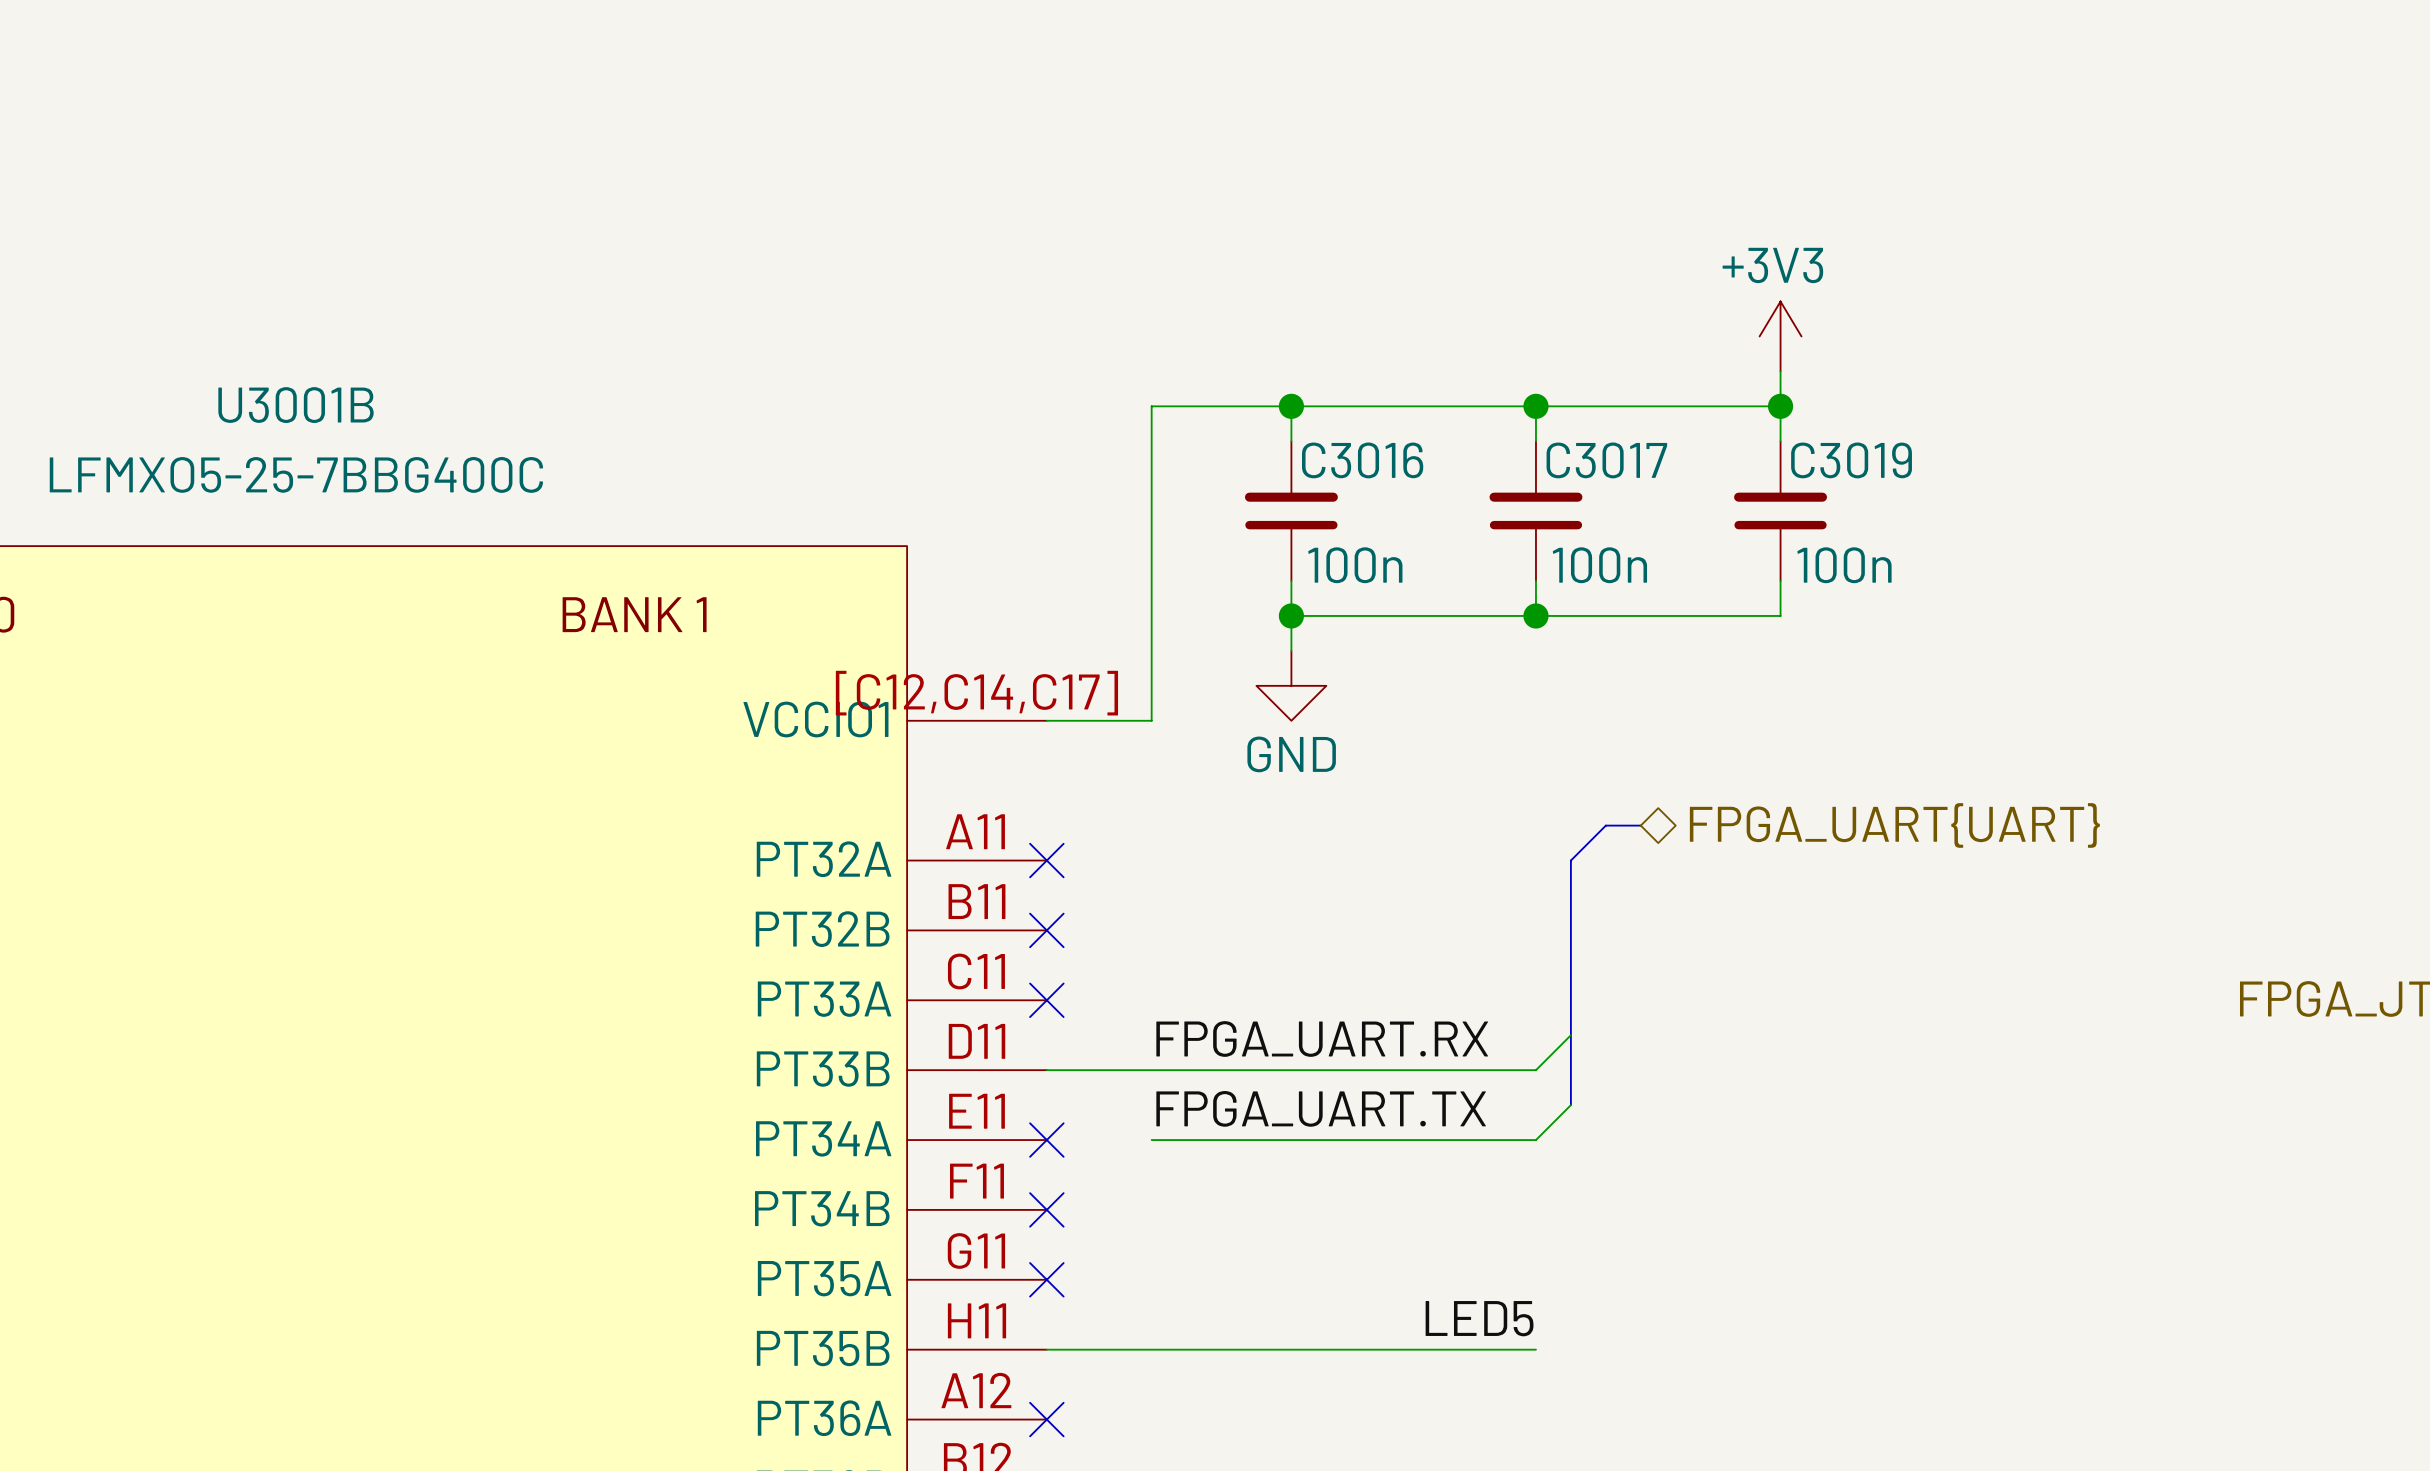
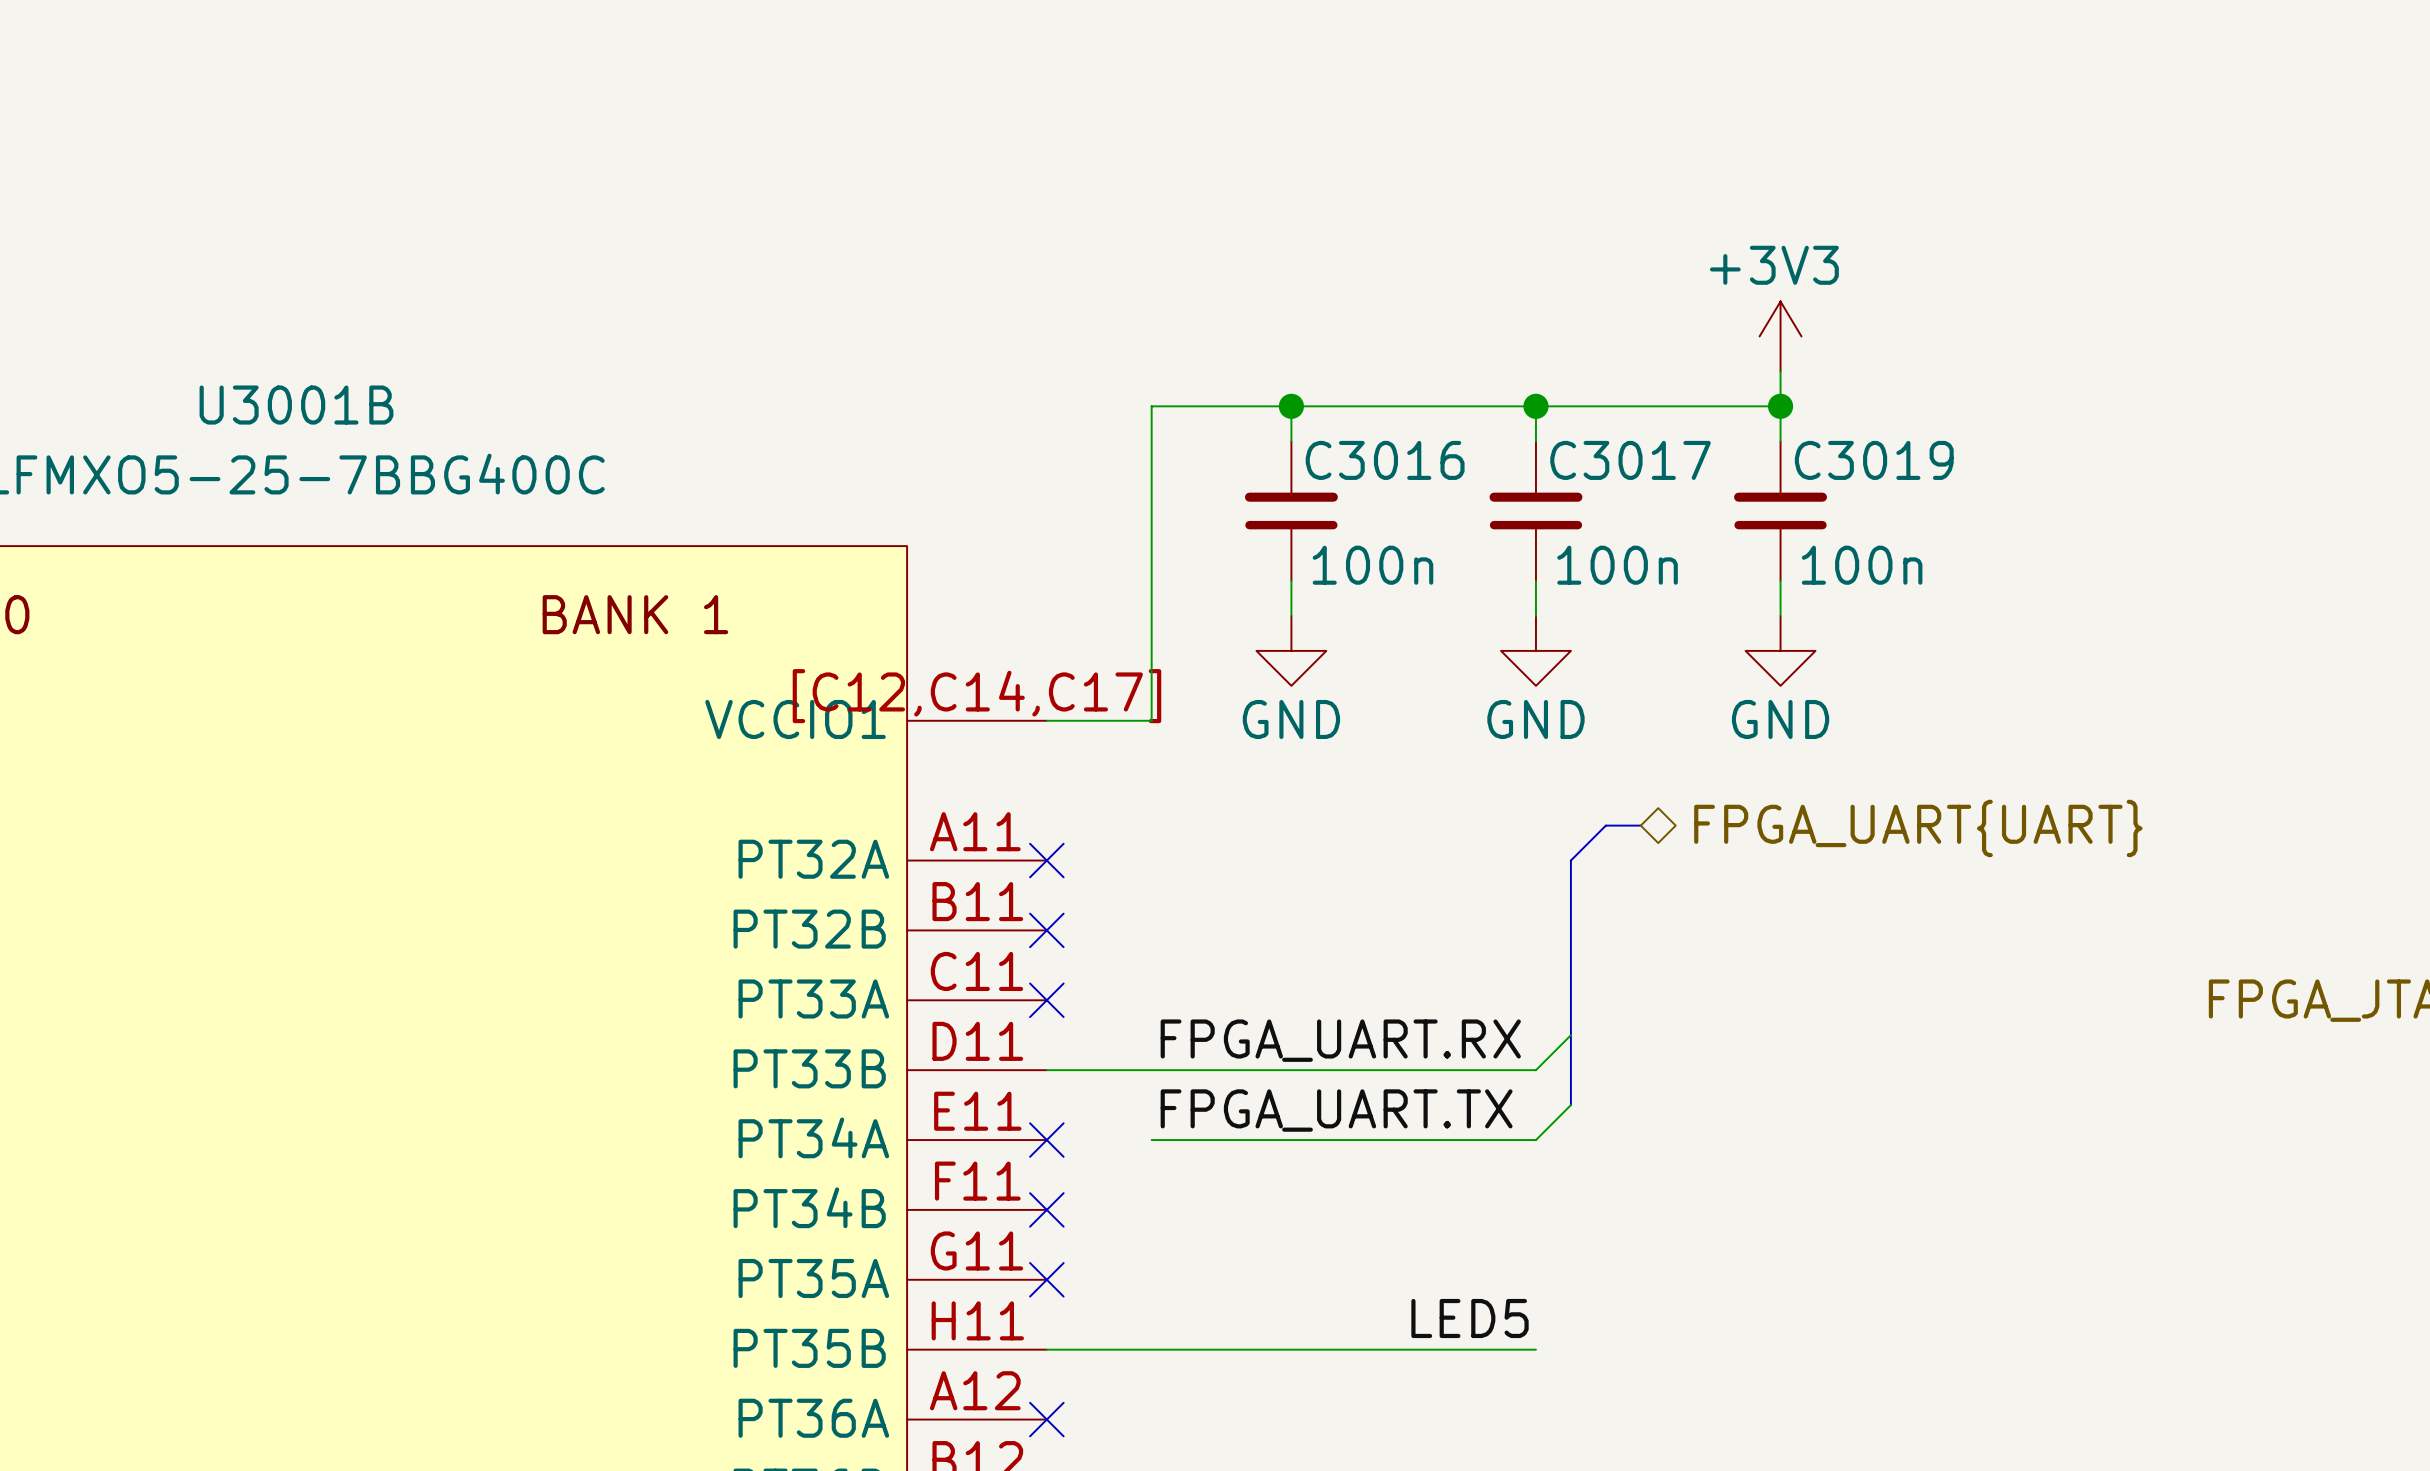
junction: (1291, 615) -> none
junction: (1535, 615) -> none
wire: (1780, 615) (1291, 615) (1291, 650) -> none
power symbol: none -> GND (1535, 650)
power symbol: none -> GND (1780, 650)
power symbol position: GND (1291, 685) -> GND (1291, 650)

